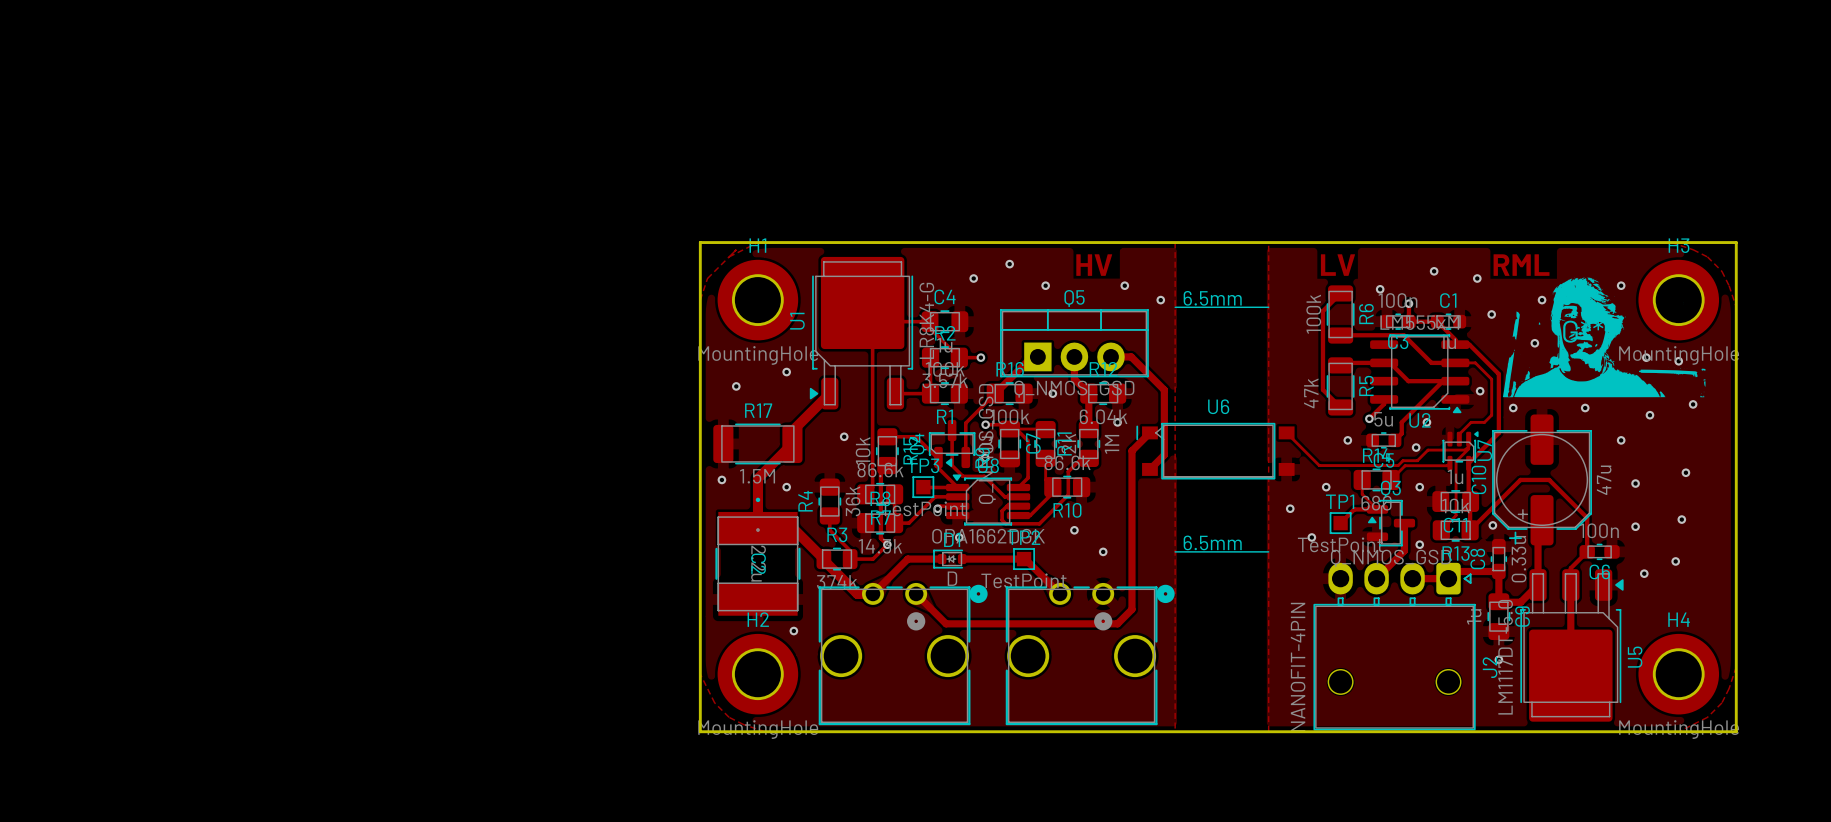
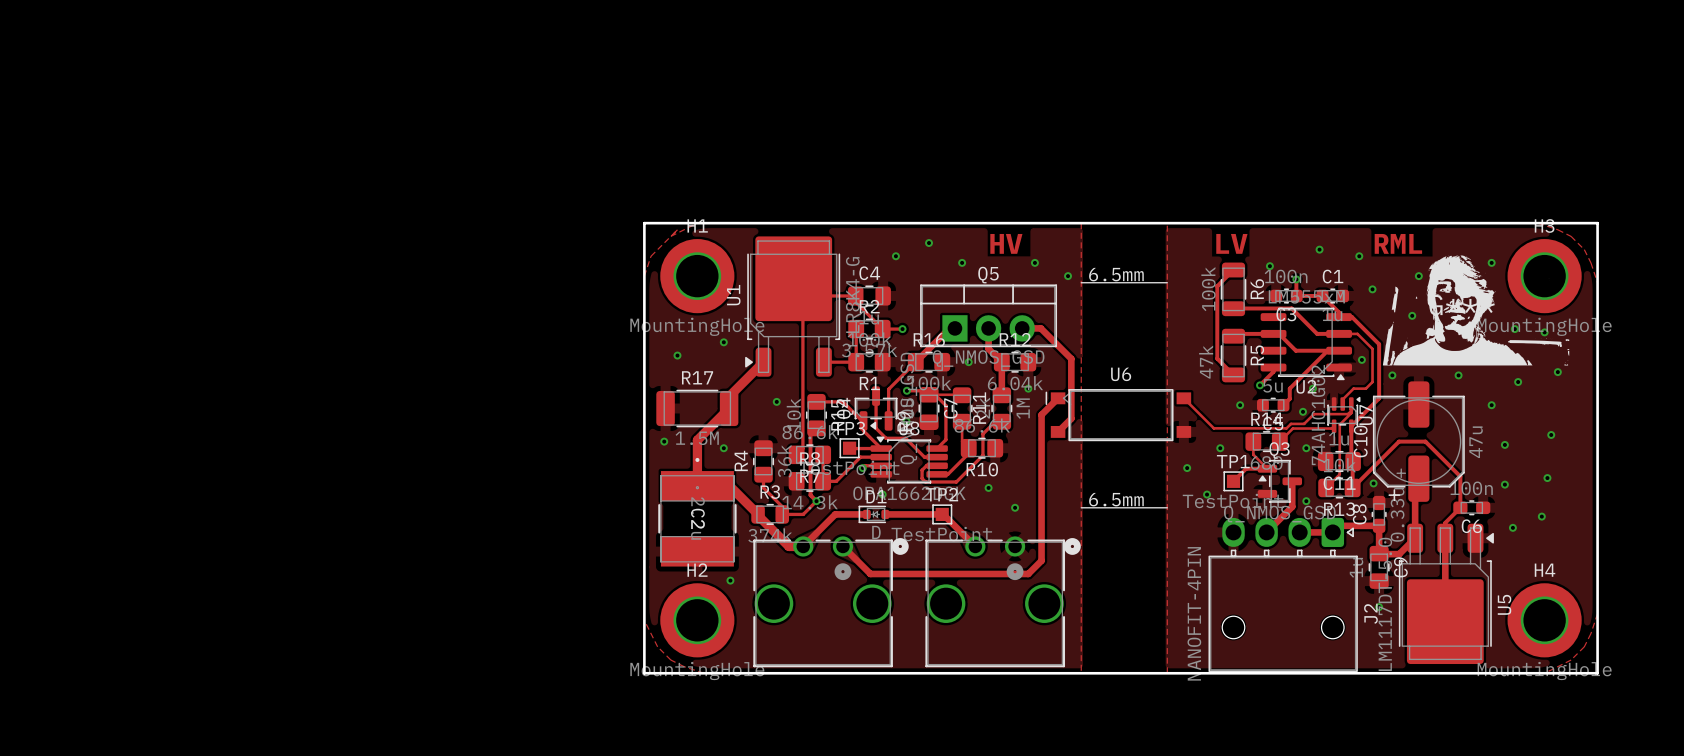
U7 value: none -> 74AHC1G02 (1318, 415)

